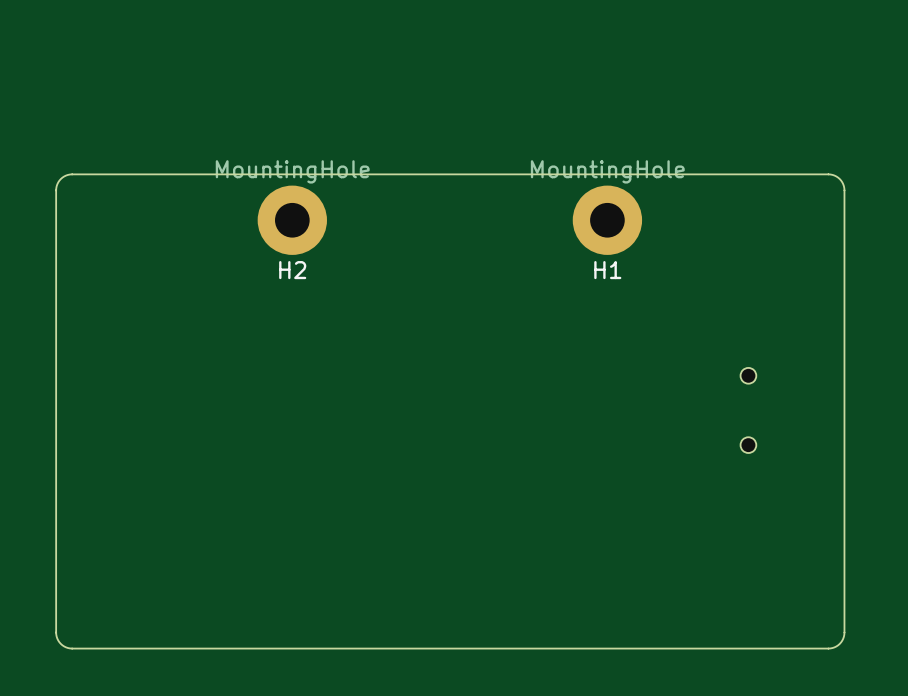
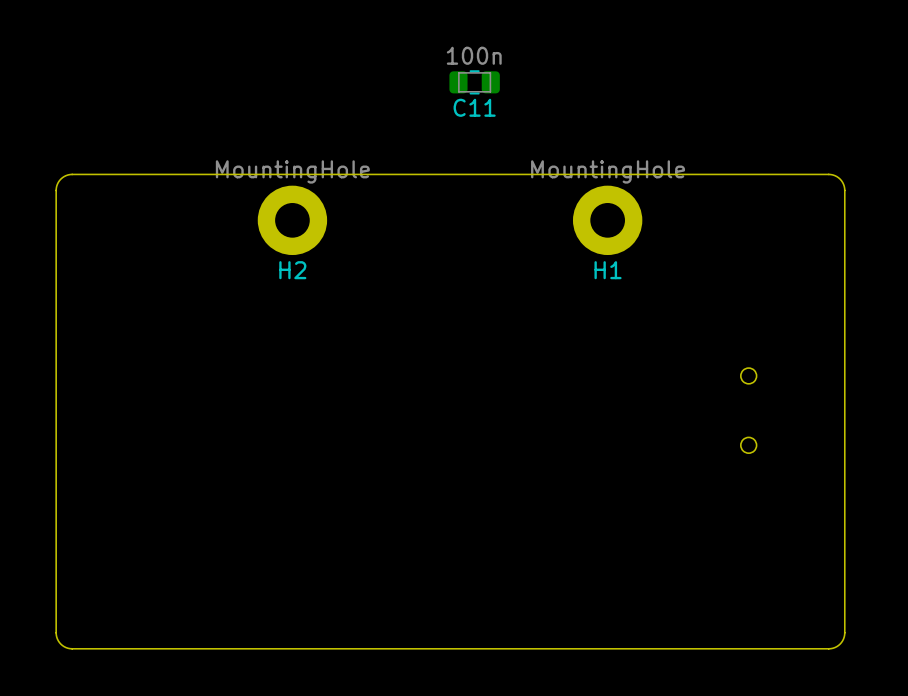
C11: none -> 100n (474, 82)

